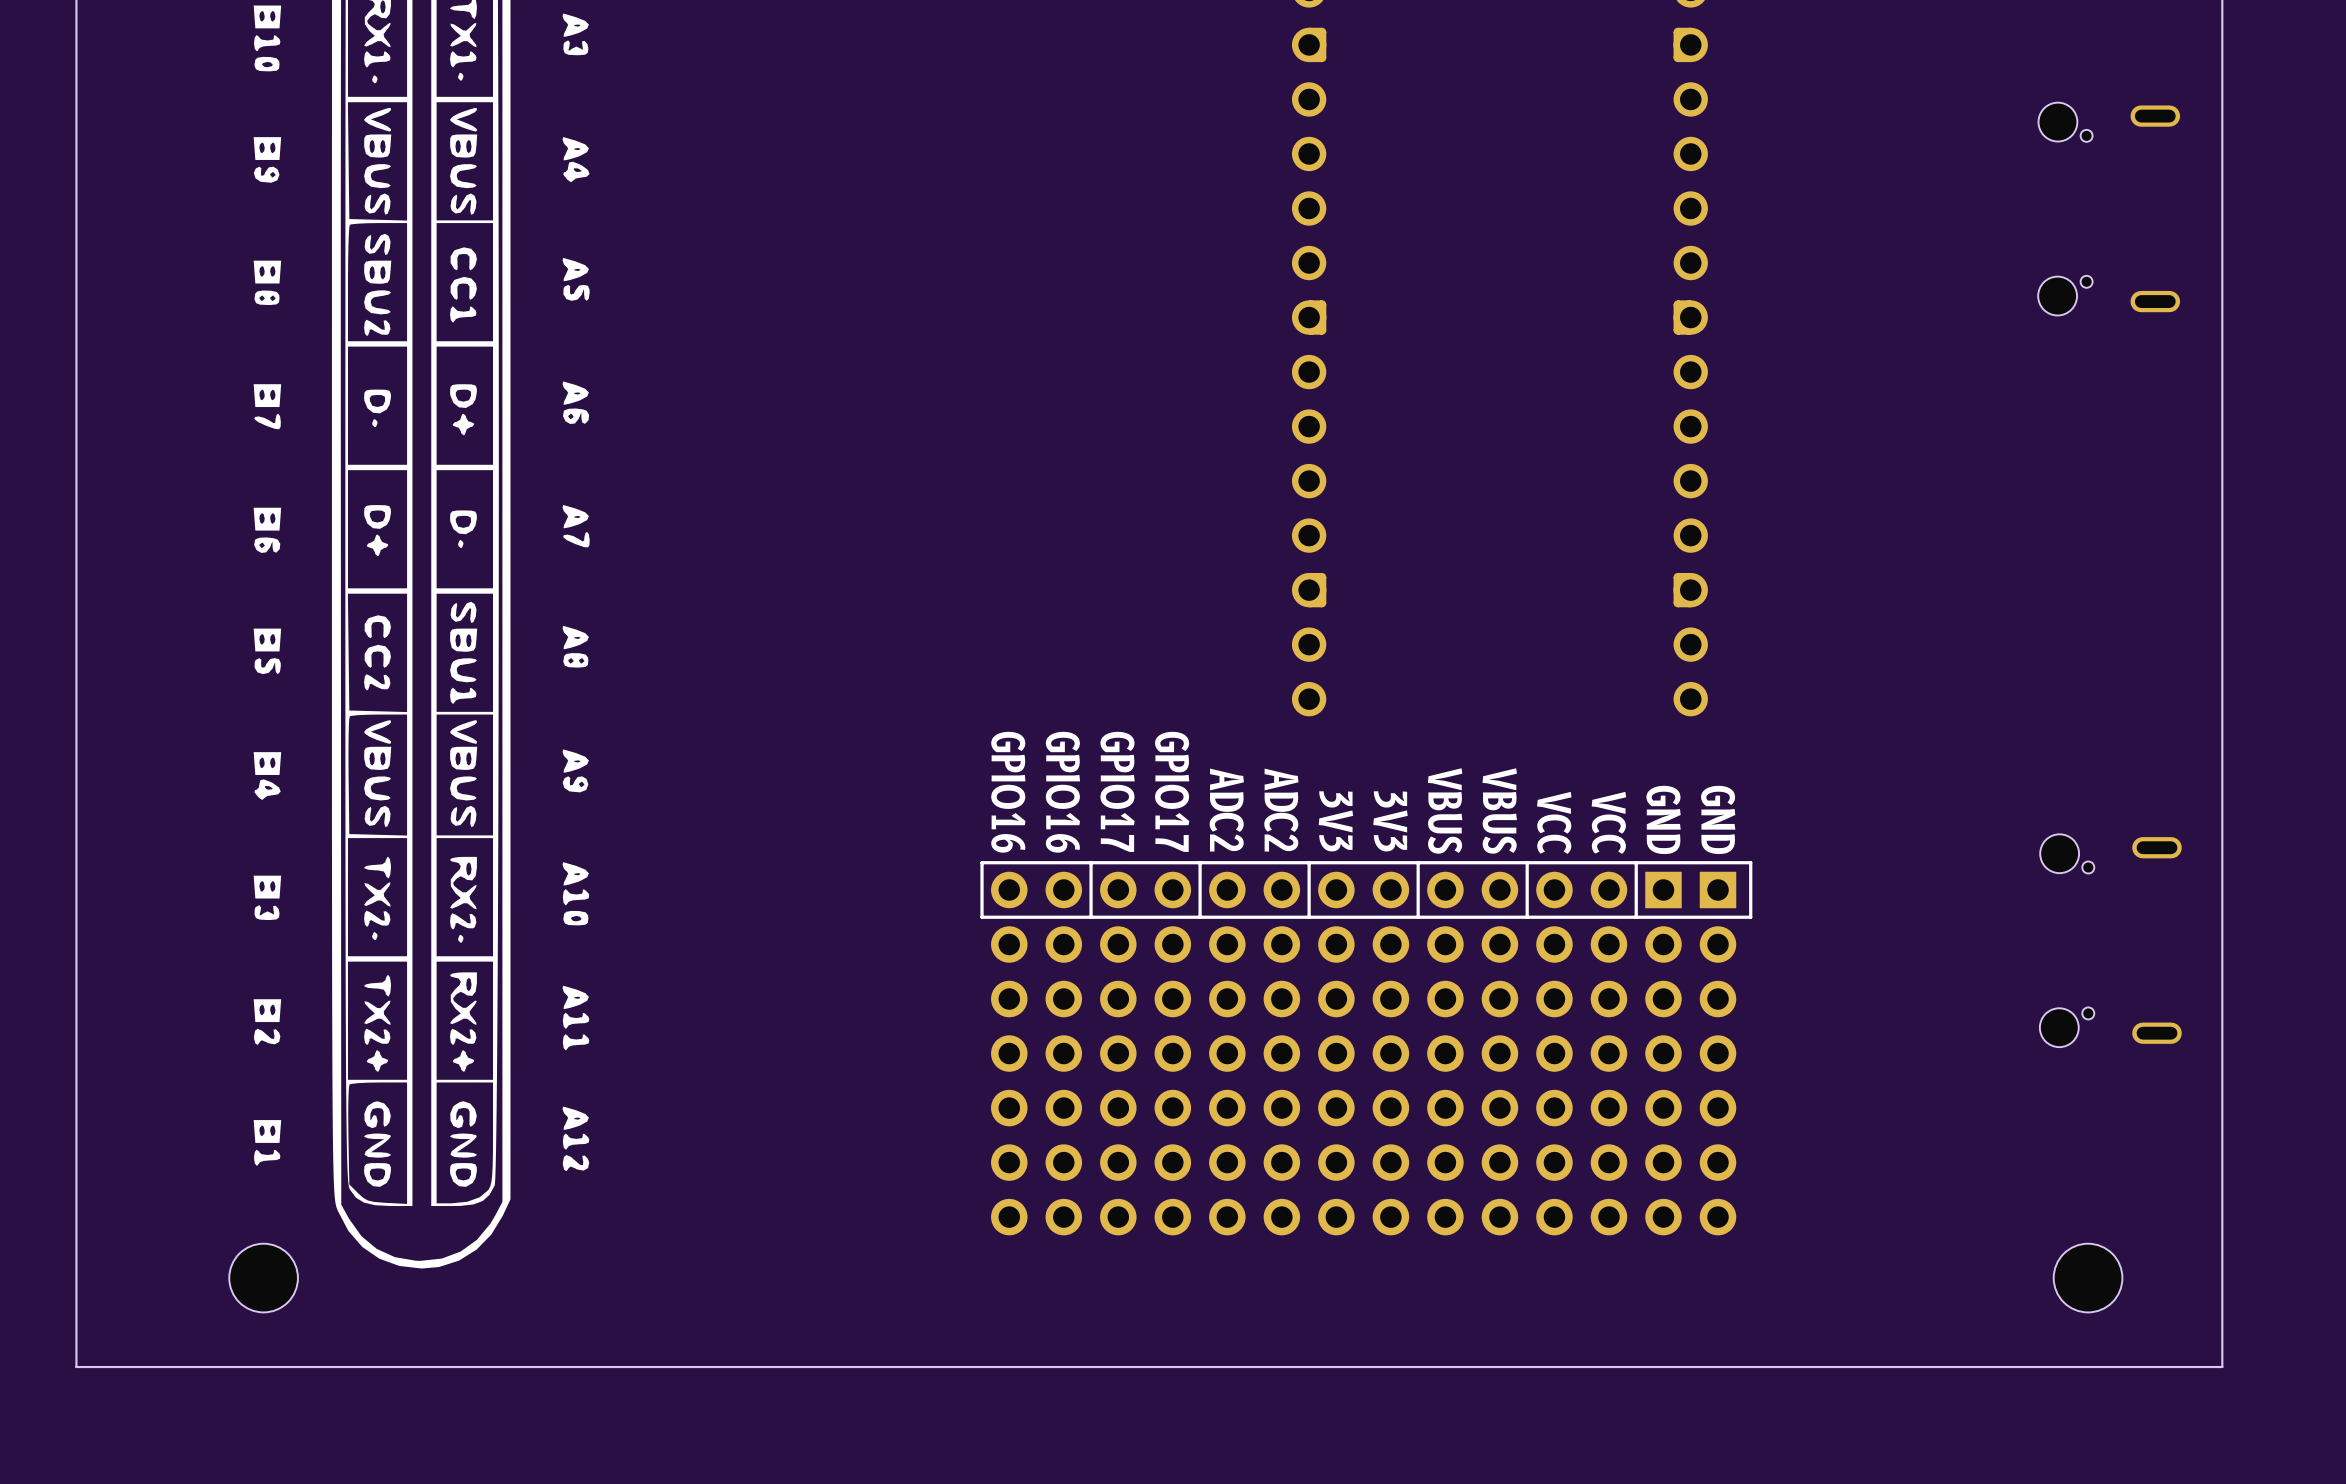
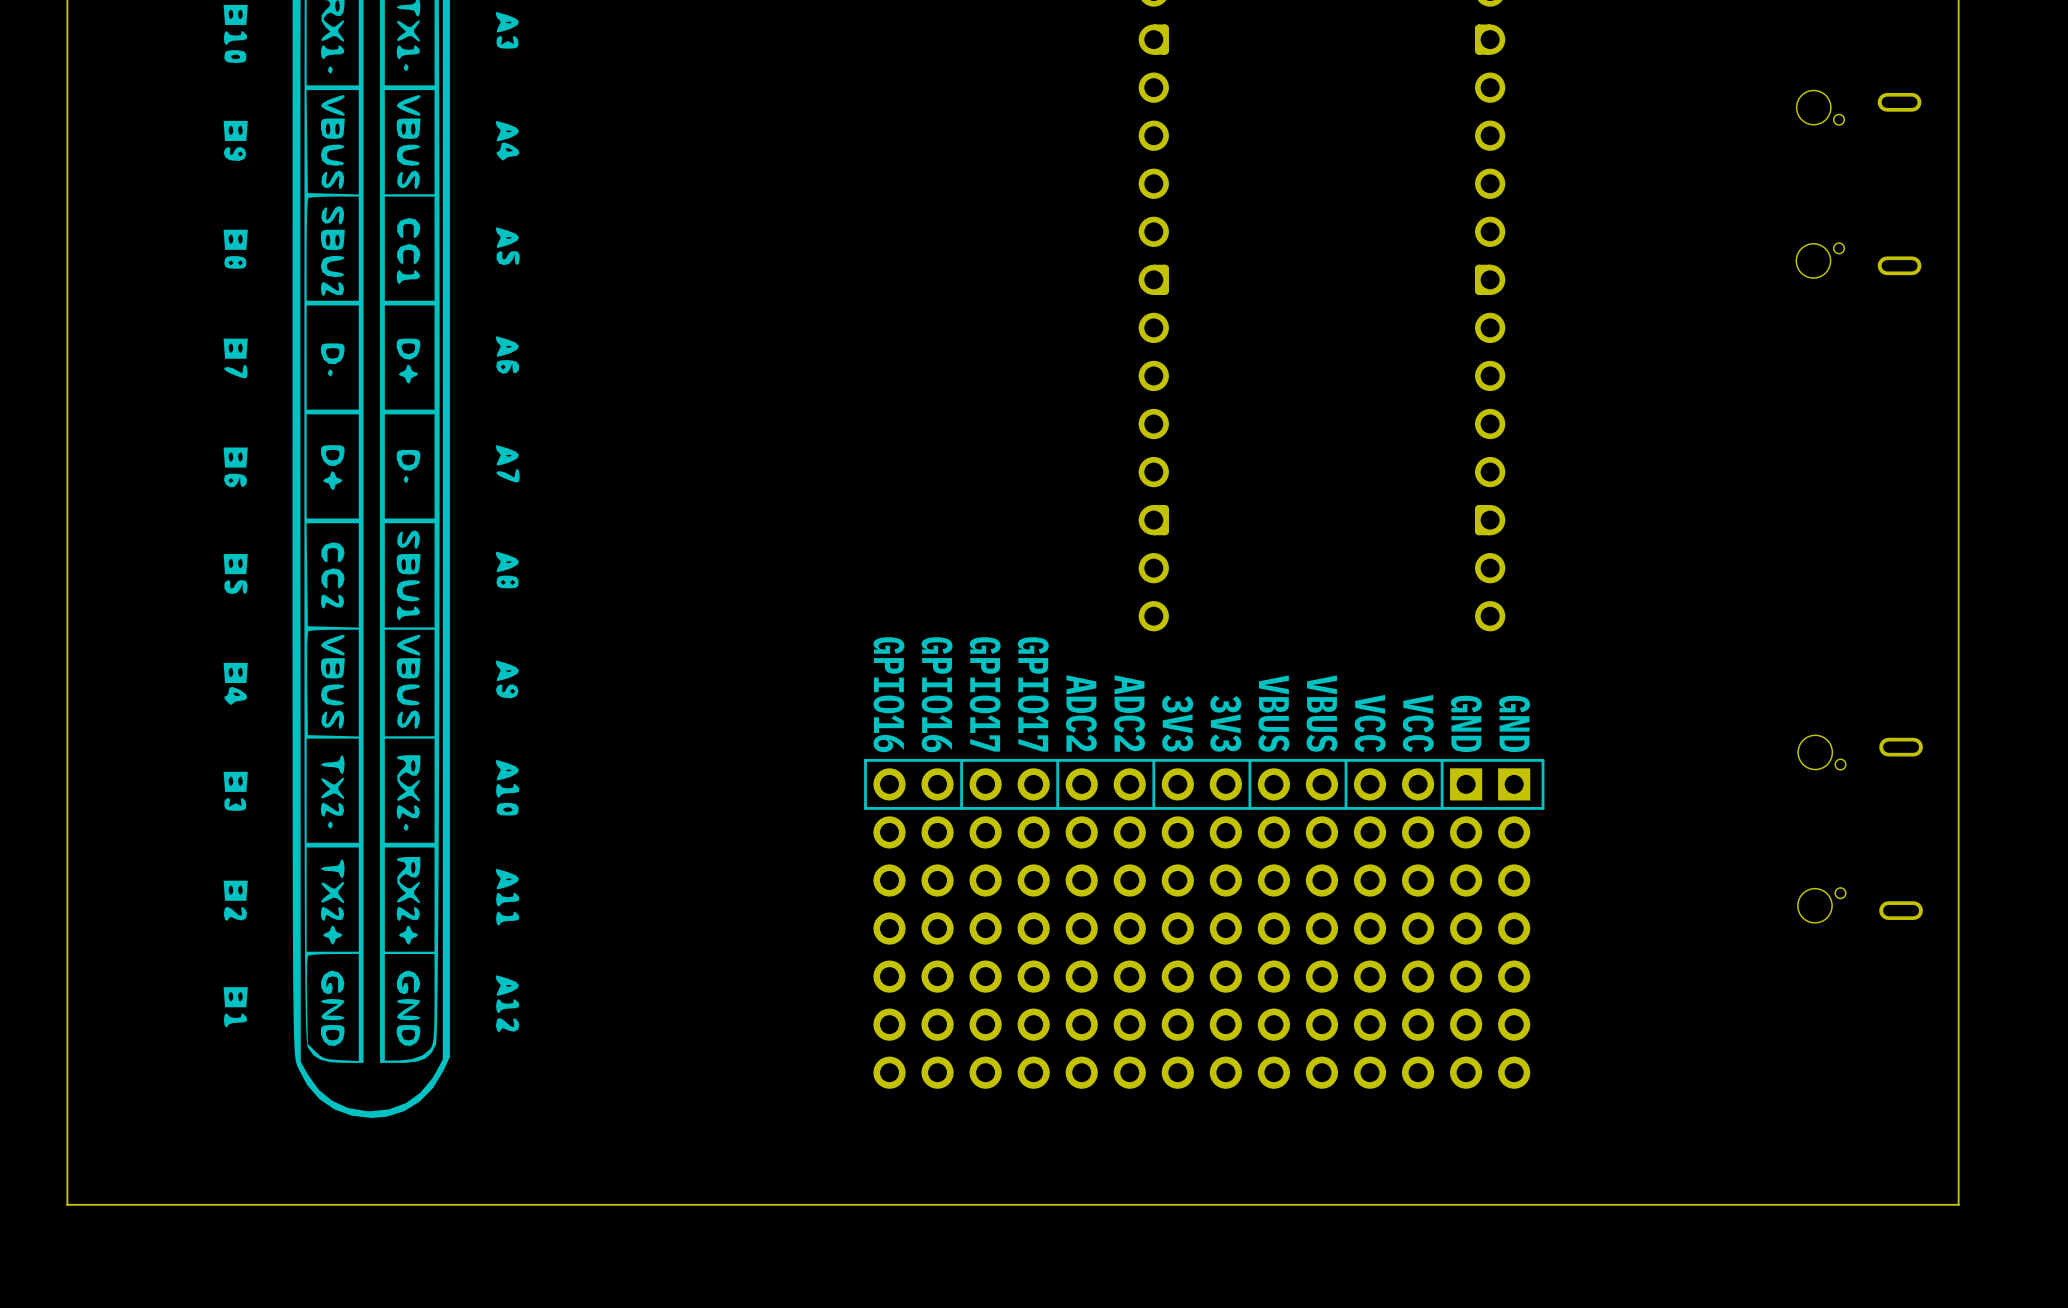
part: (263, 1278) -> none
part: (2088, 1278) -> none

